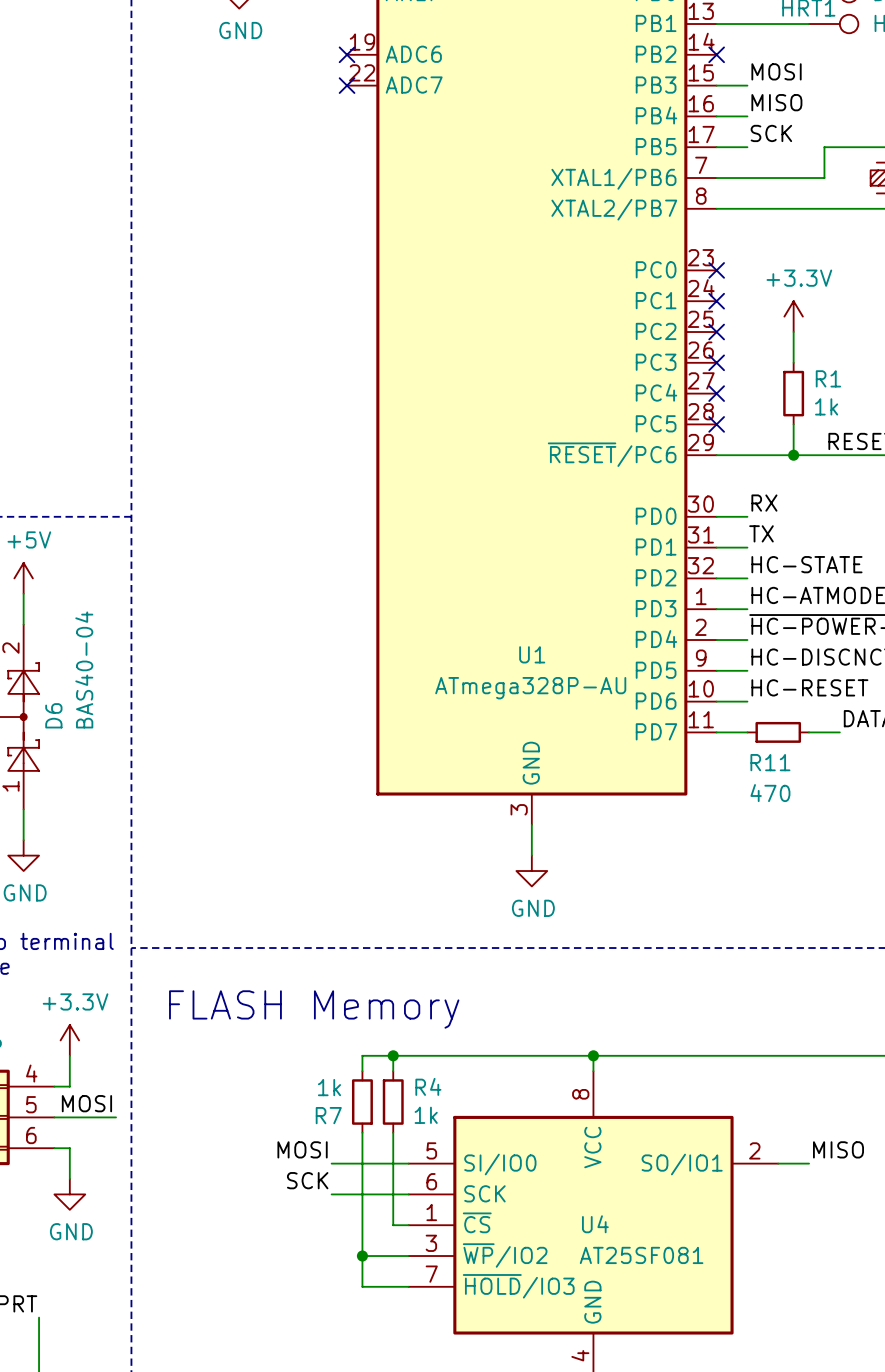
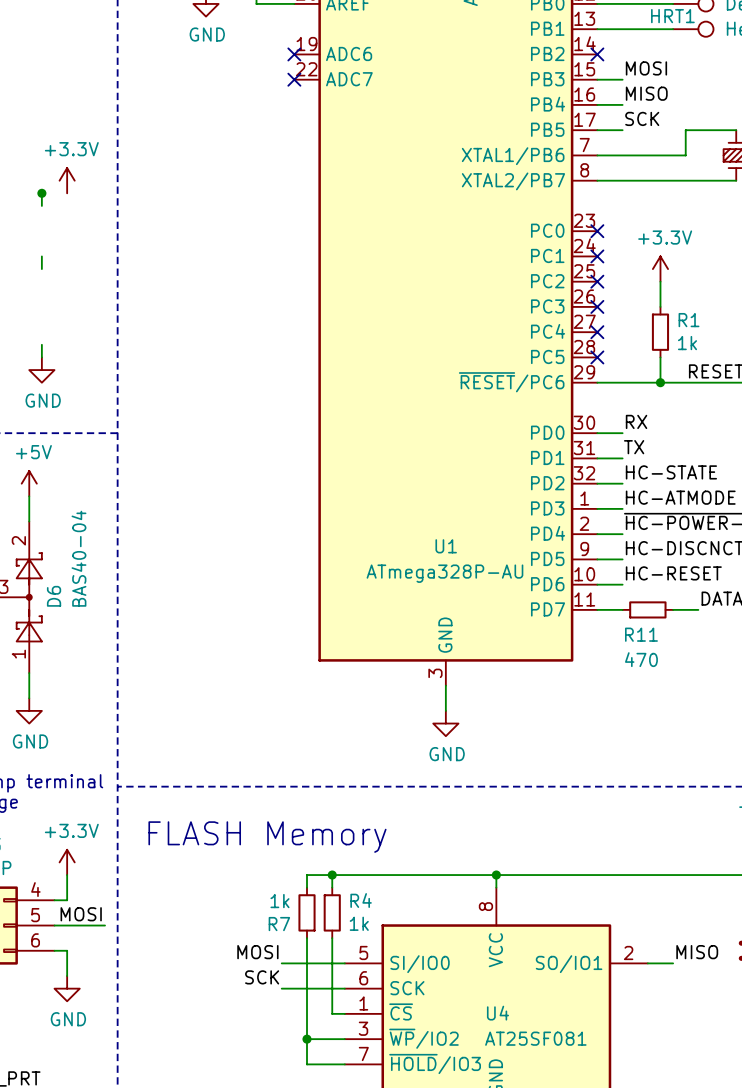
power symbol: none -> +3.3V (67, 180)
wire: none -> (41, 193) (41, 205)
junction: none -> (41, 193)
wire: none -> (41, 256) (41, 269)
wire: none -> (41, 344) (41, 357)
power symbol: none -> GND (41, 370)

